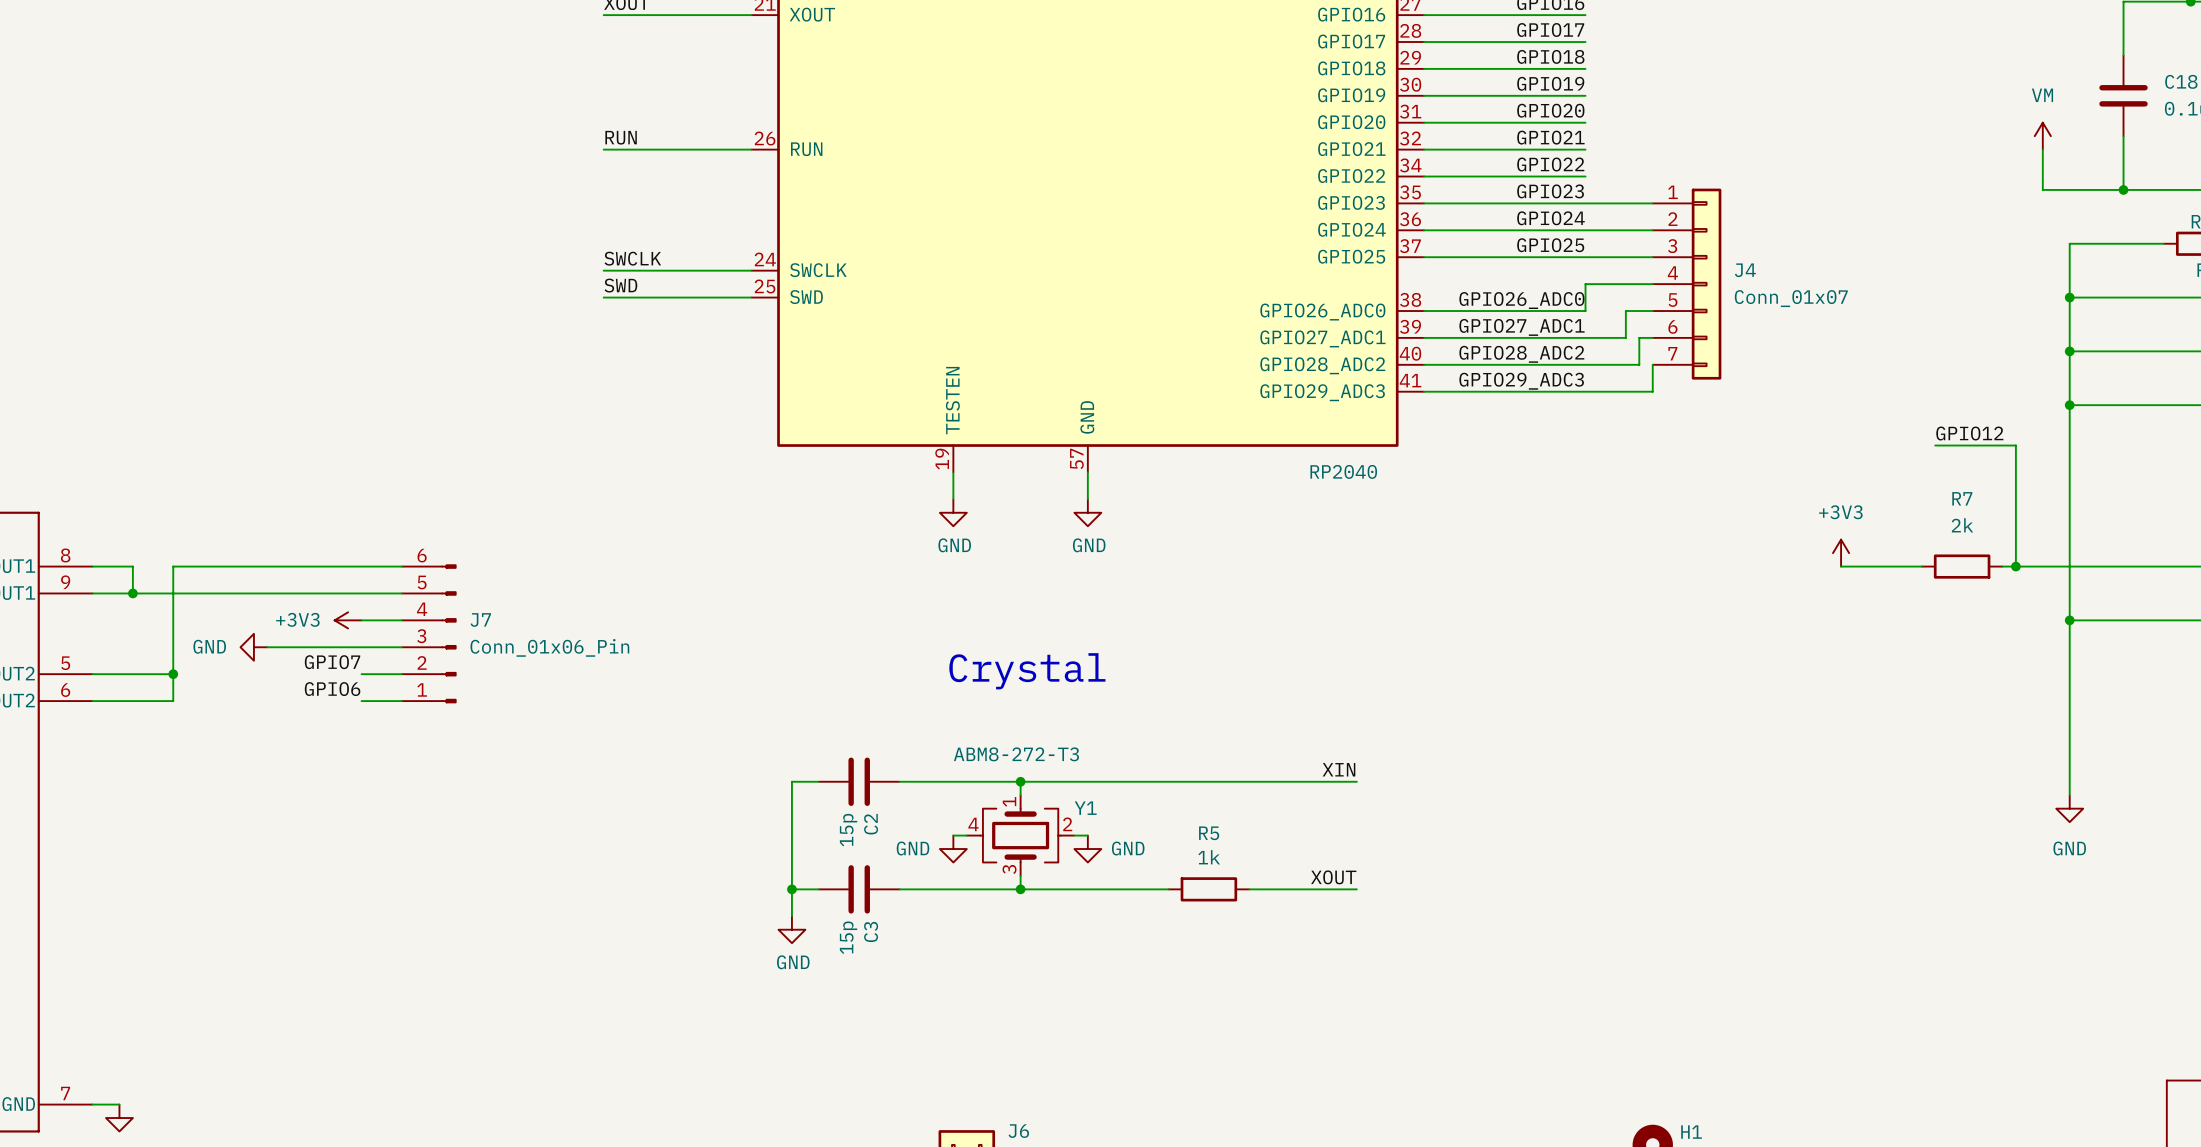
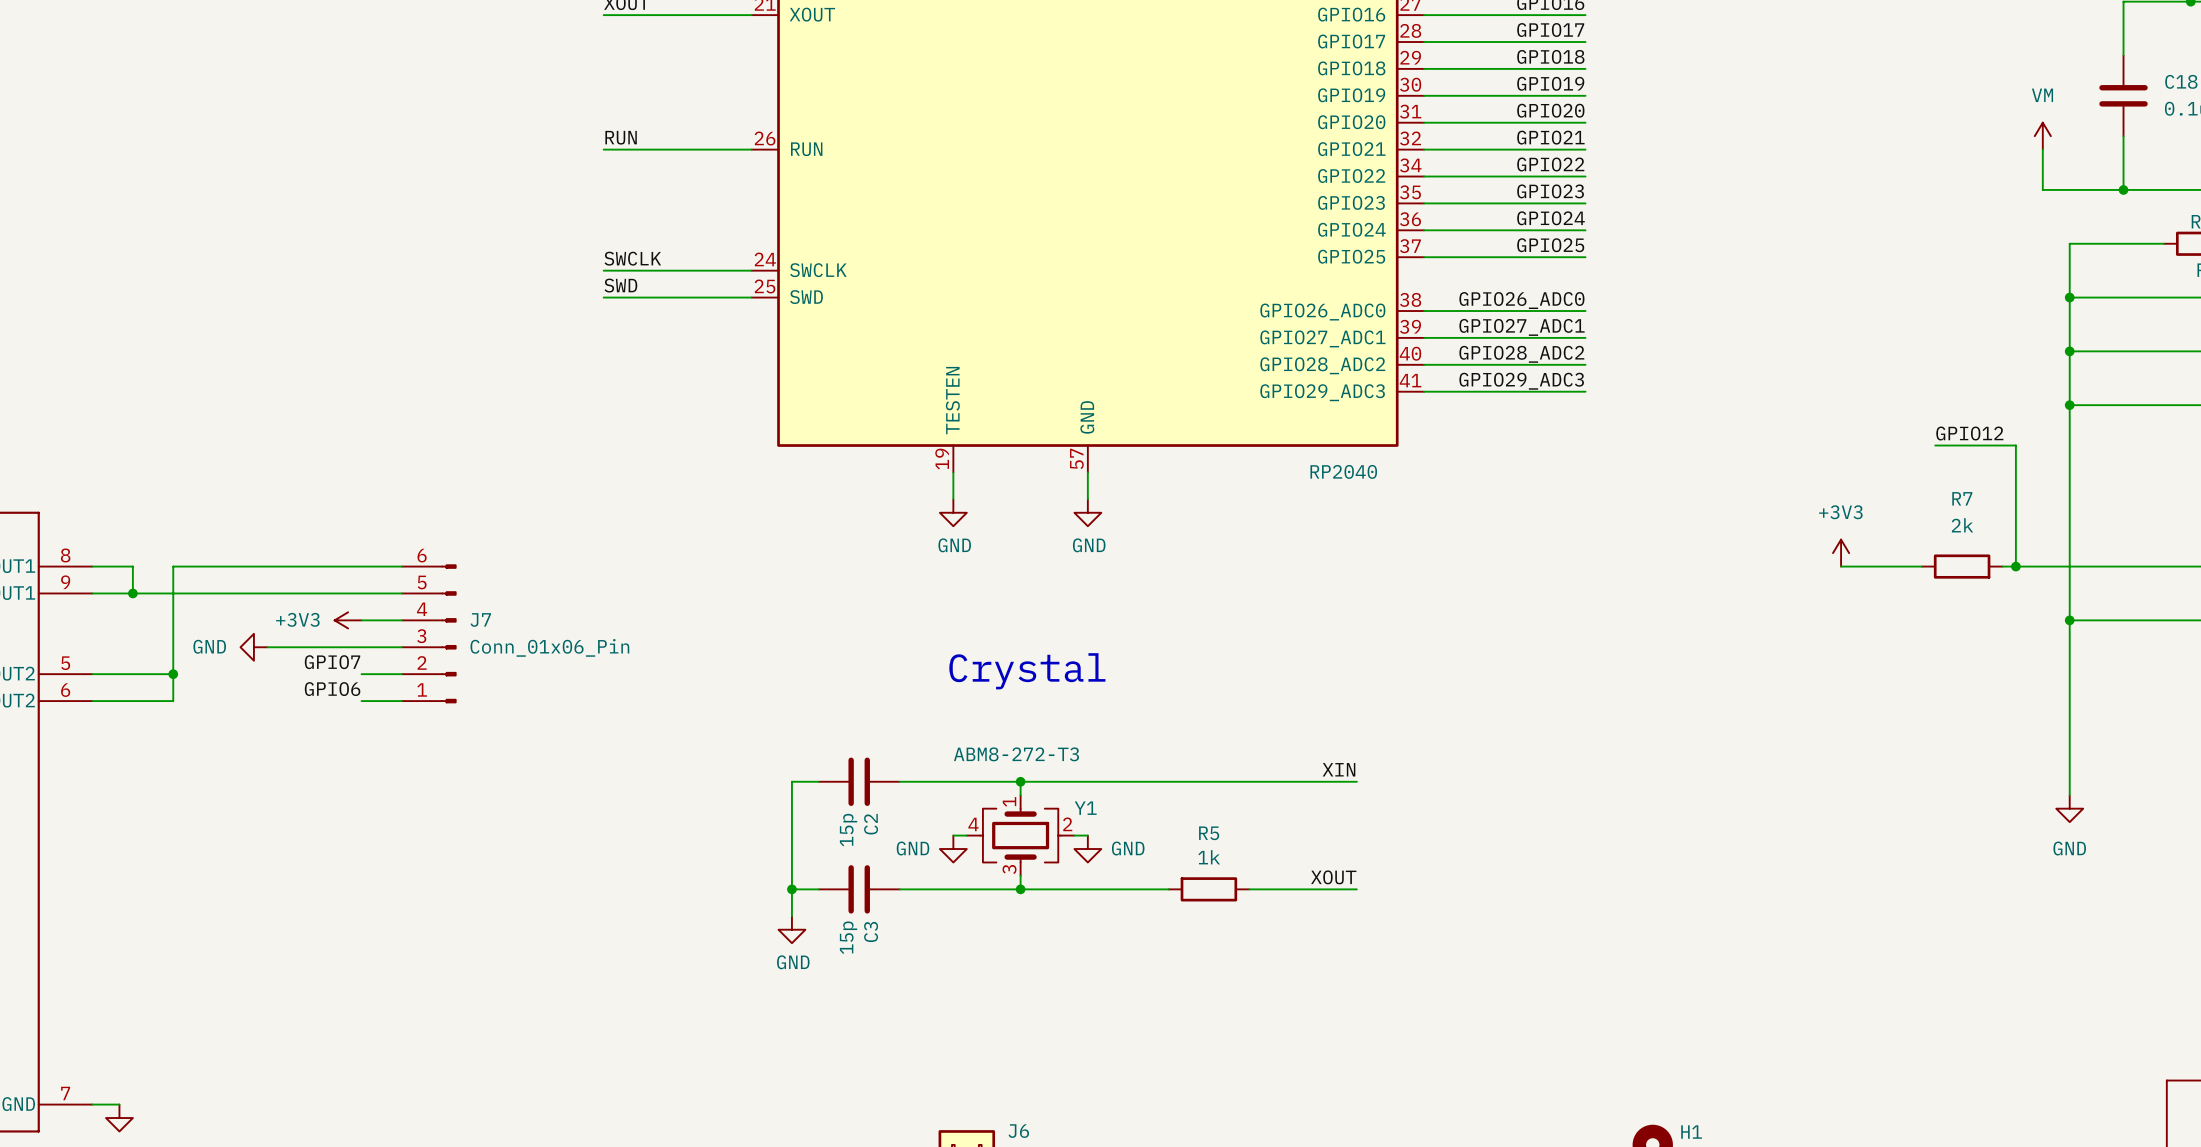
wire: (1585, 203) (1652, 203) -> none
wire: (1585, 230) (1652, 230) -> none
wire: (1585, 257) (1652, 257) -> none
wire: (1652, 284) (1585, 284) (1585, 311) -> none
J4: Conn_01x07 (1687, 284) -> none
wire: (1652, 311) (1625, 311) (1625, 337) (1585, 337) -> none
wire: (1652, 337) (1639, 337) (1639, 364) (1585, 364) -> none
wire: (1652, 364) (1652, 391) (1585, 391) -> none

